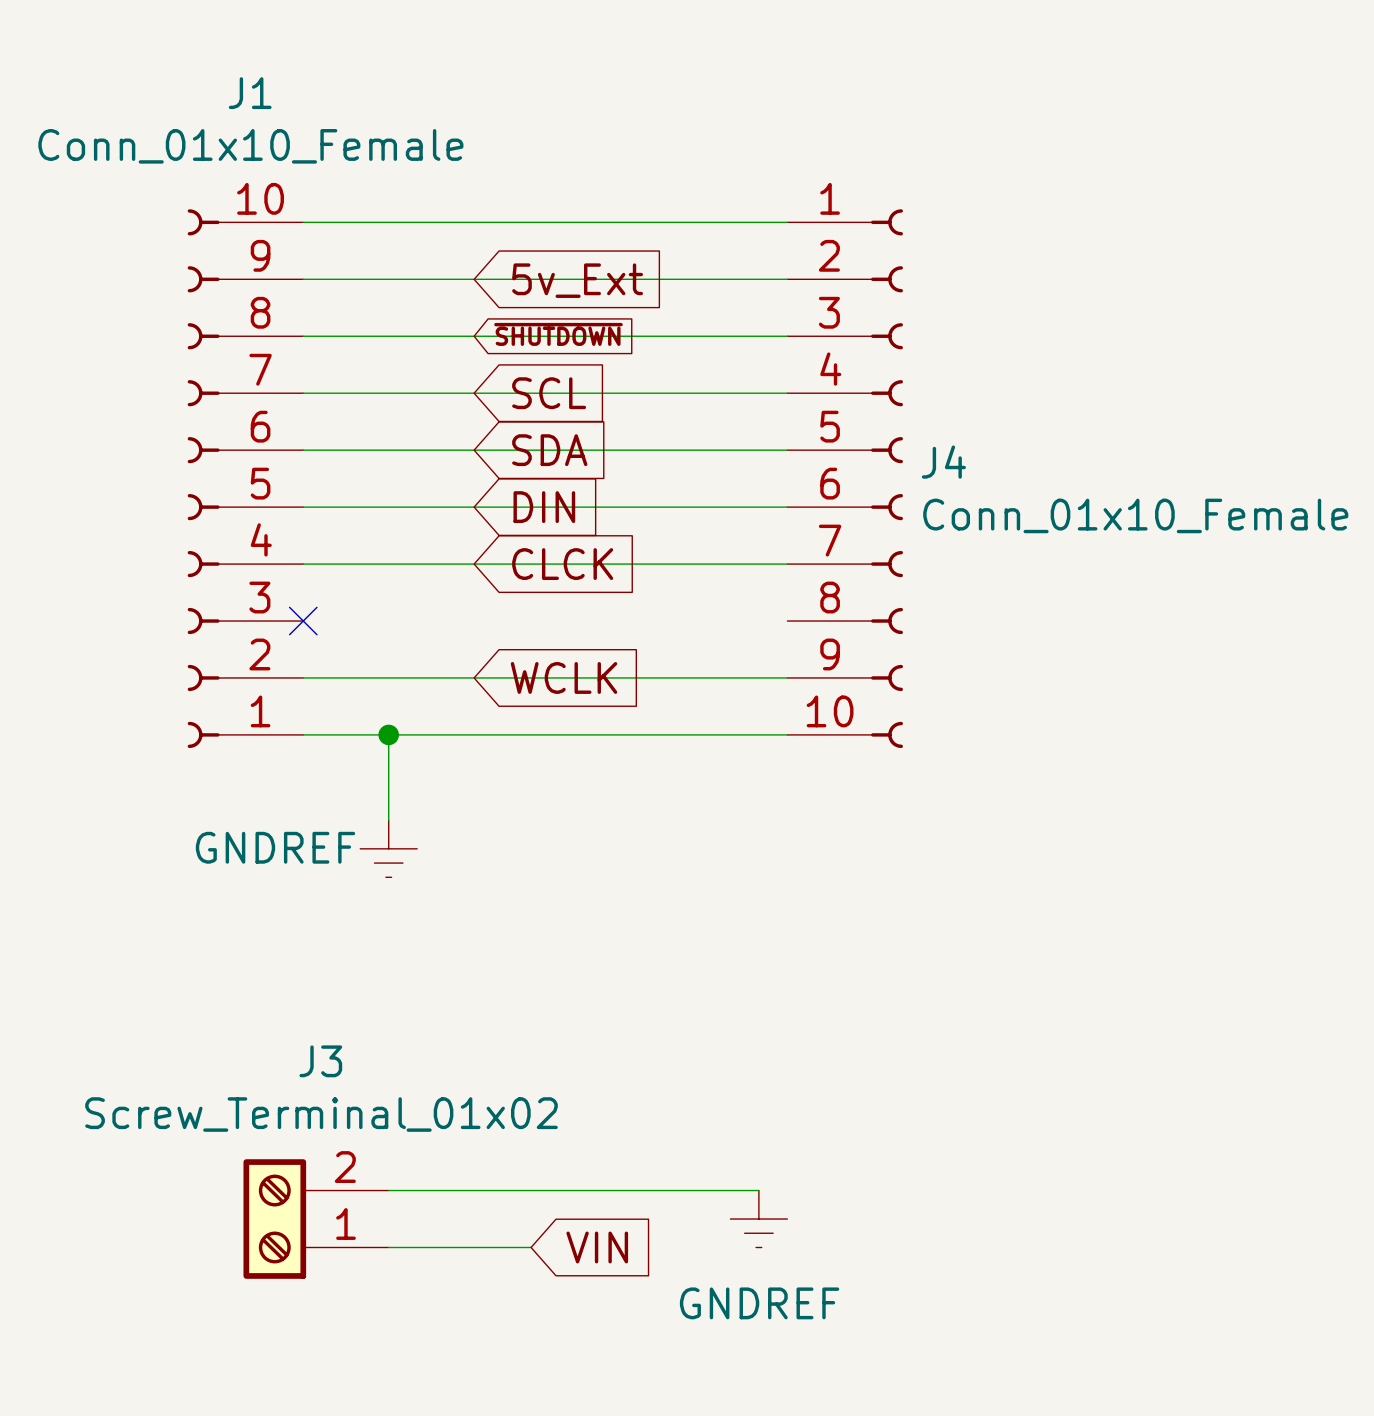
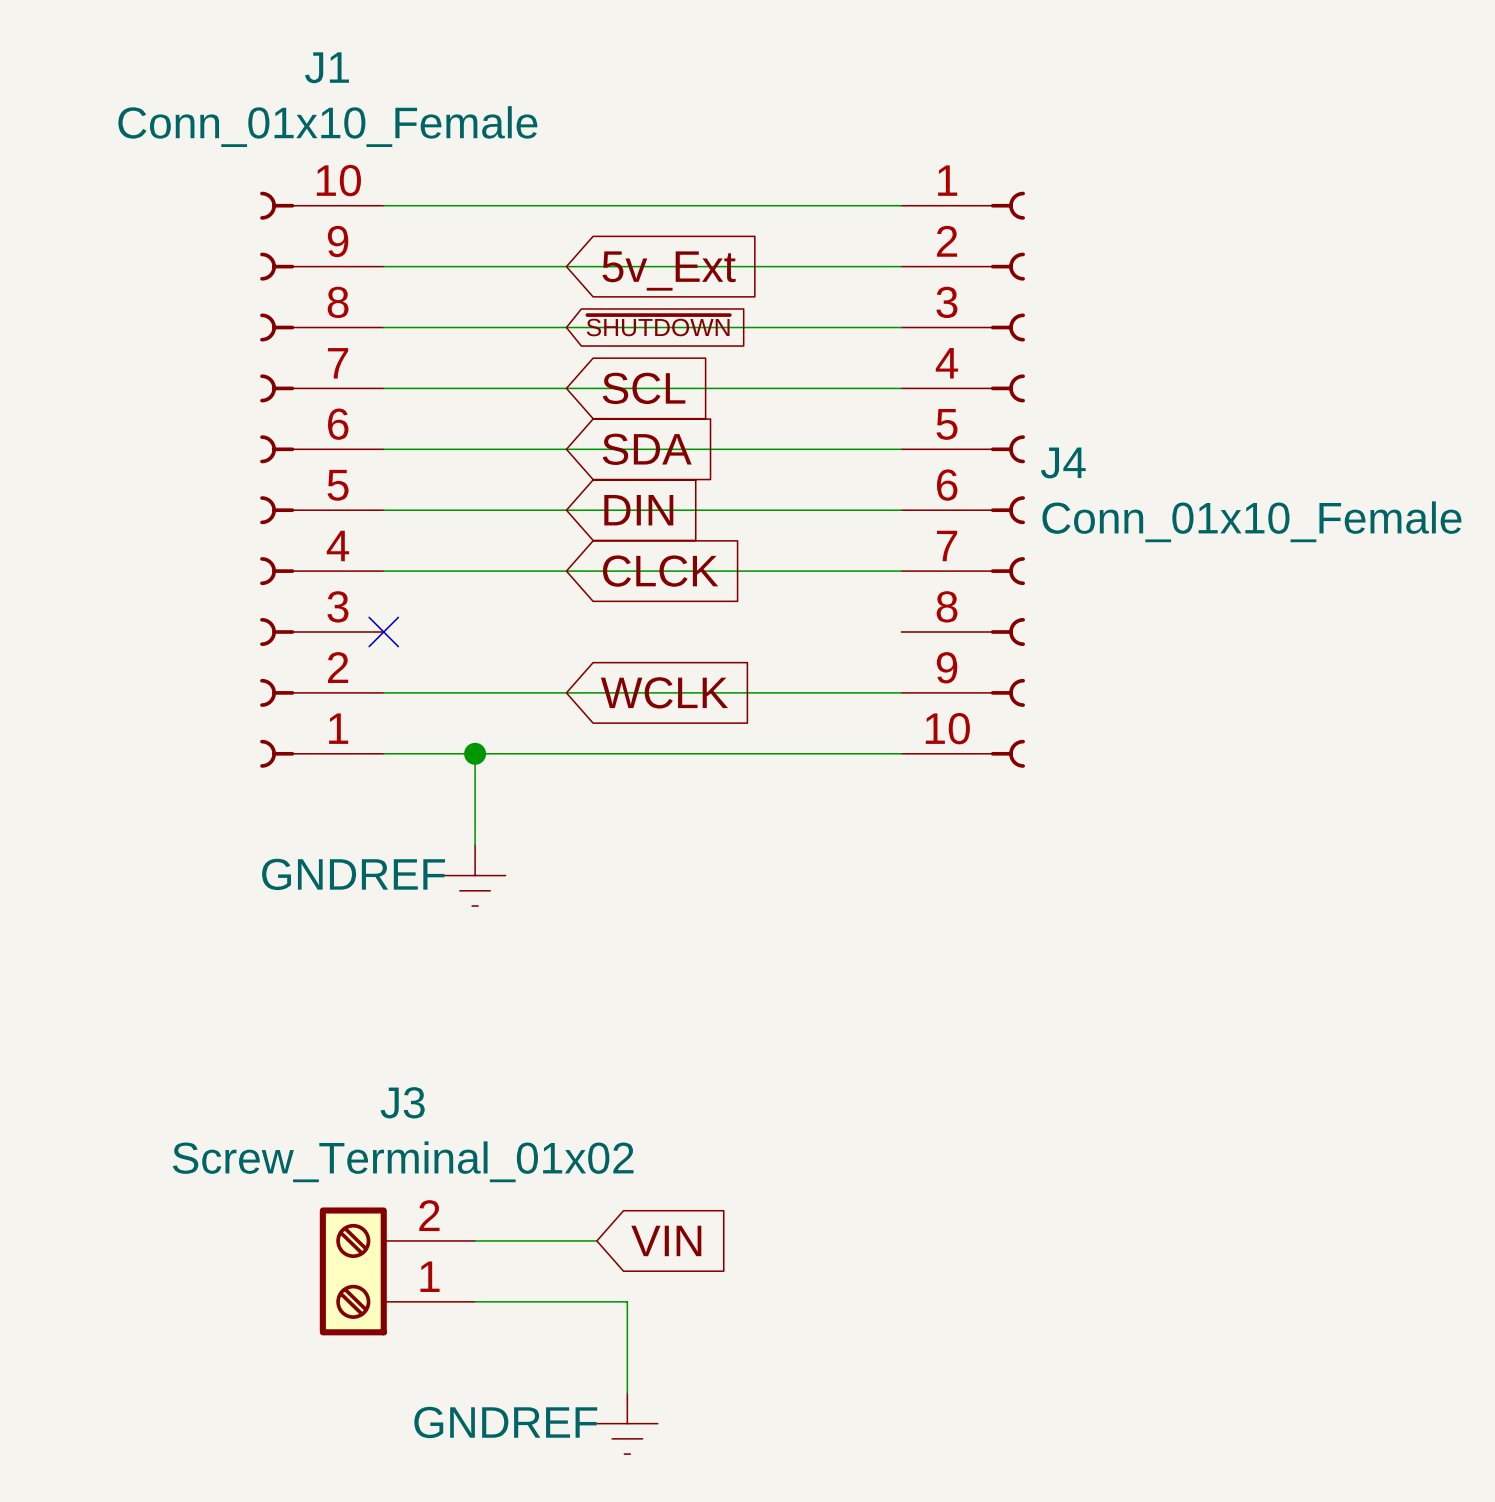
wire: (502, 1190) (758, 1190) -> none
power symbol position: GNDREF (758, 1219) -> GNDREF (627, 1423)
wire: none -> (627, 1301) (627, 1393)
global label position: VIN (597, 1247) -> VIN (666, 1240)
power symbol text position: GNDREF (759, 1303) -> GNDREF (505, 1422)

